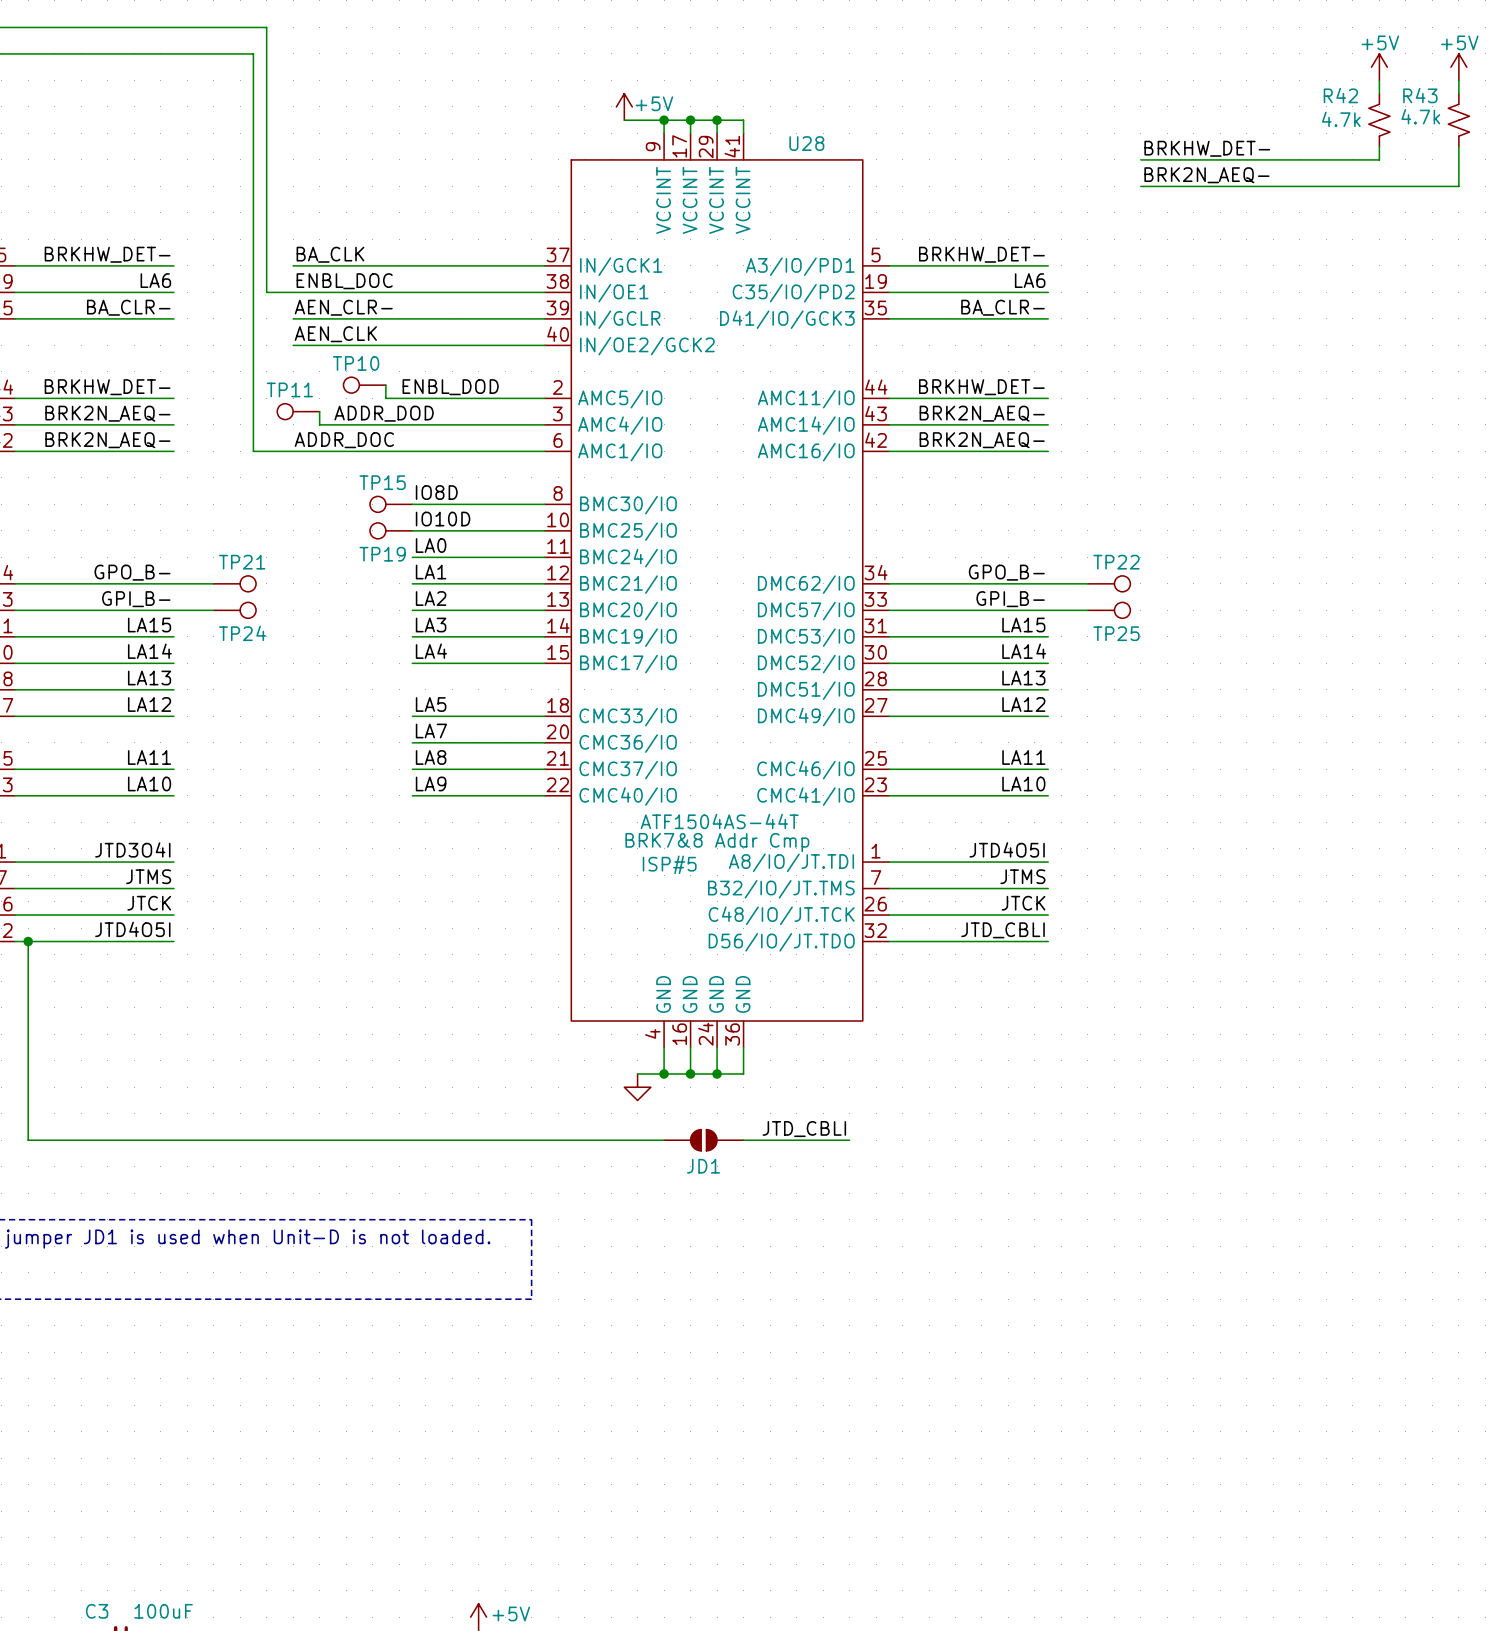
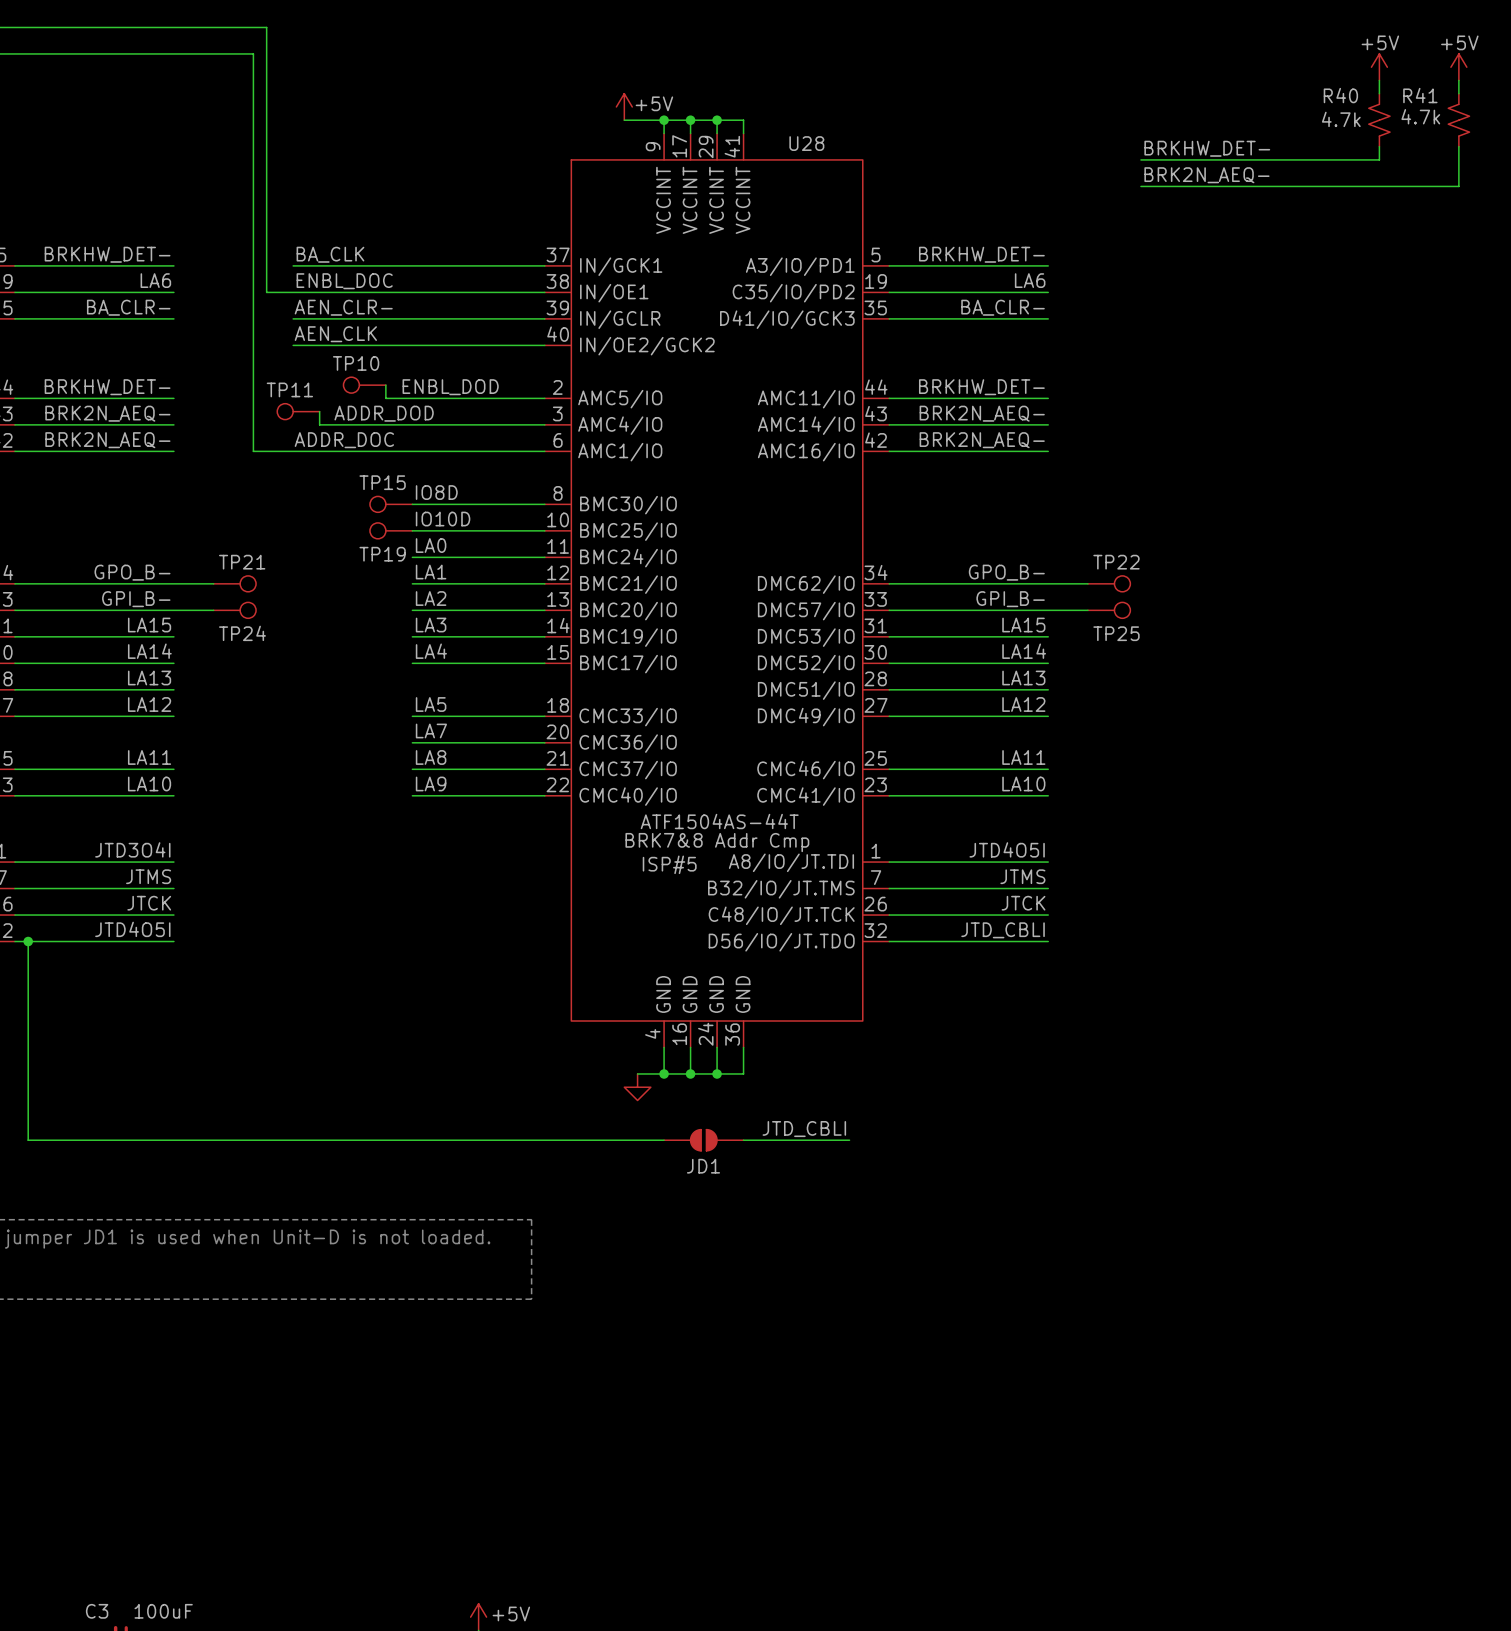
R42 name: R42 (1340, 95) -> R40 (1340, 95)
R43 name: R43 (1420, 95) -> R41 (1420, 95)

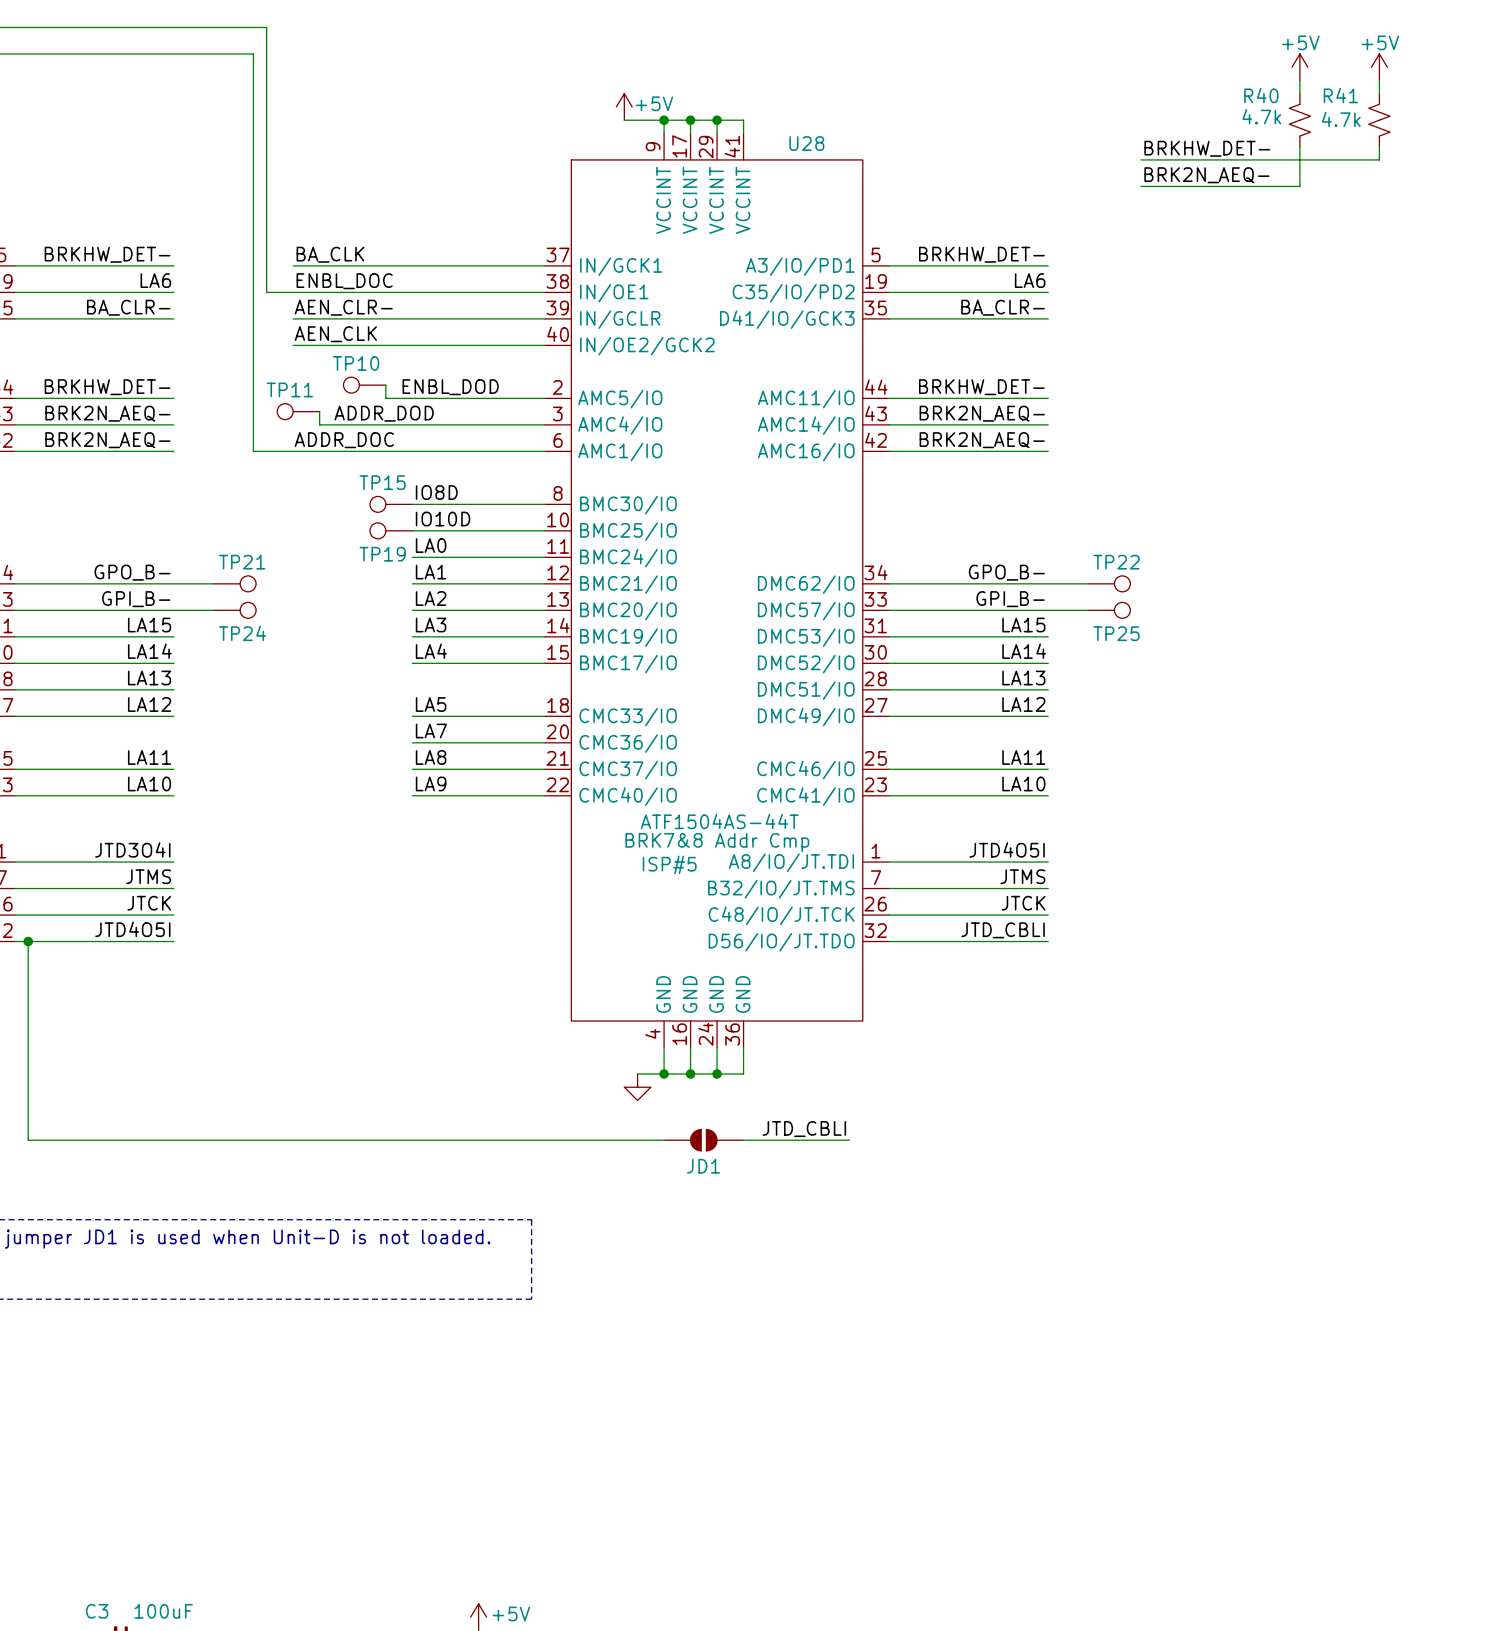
power symbol position: +5V (1458, 67) -> +5V (1299, 67)
wire: (1458, 80) (1458, 93) -> (1299, 80) (1299, 93)
R40 name: R40 (1340, 95) -> R41 (1340, 95)
R40: none -> 4.7k (1299, 120)
R41: 4.7k (1458, 120) -> none
wire: (1458, 146) (1458, 186) (1299, 186) -> (1299, 146) (1299, 186)

